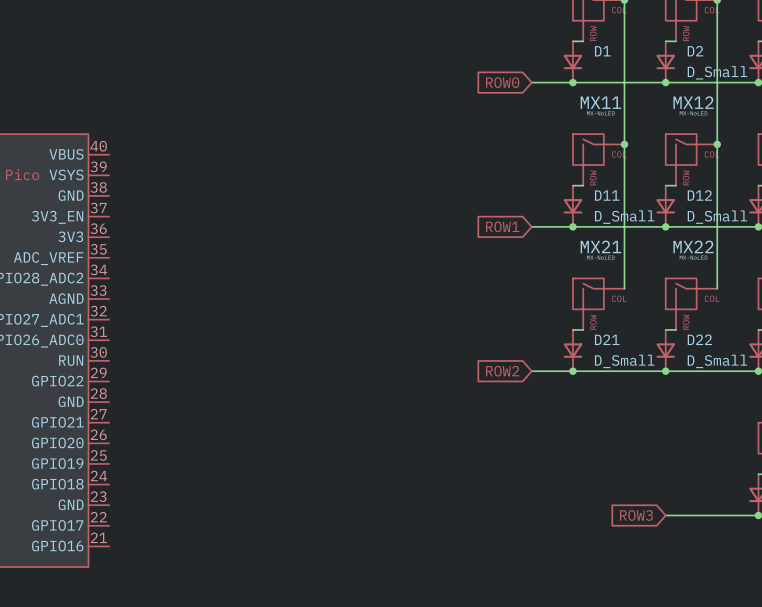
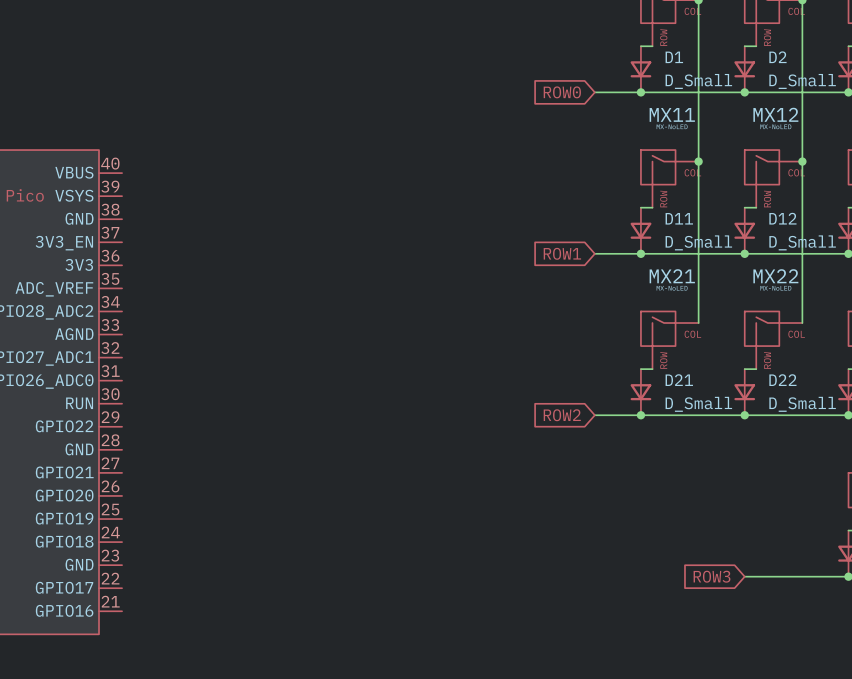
D1 value: none -> D_Small (698, 81)

